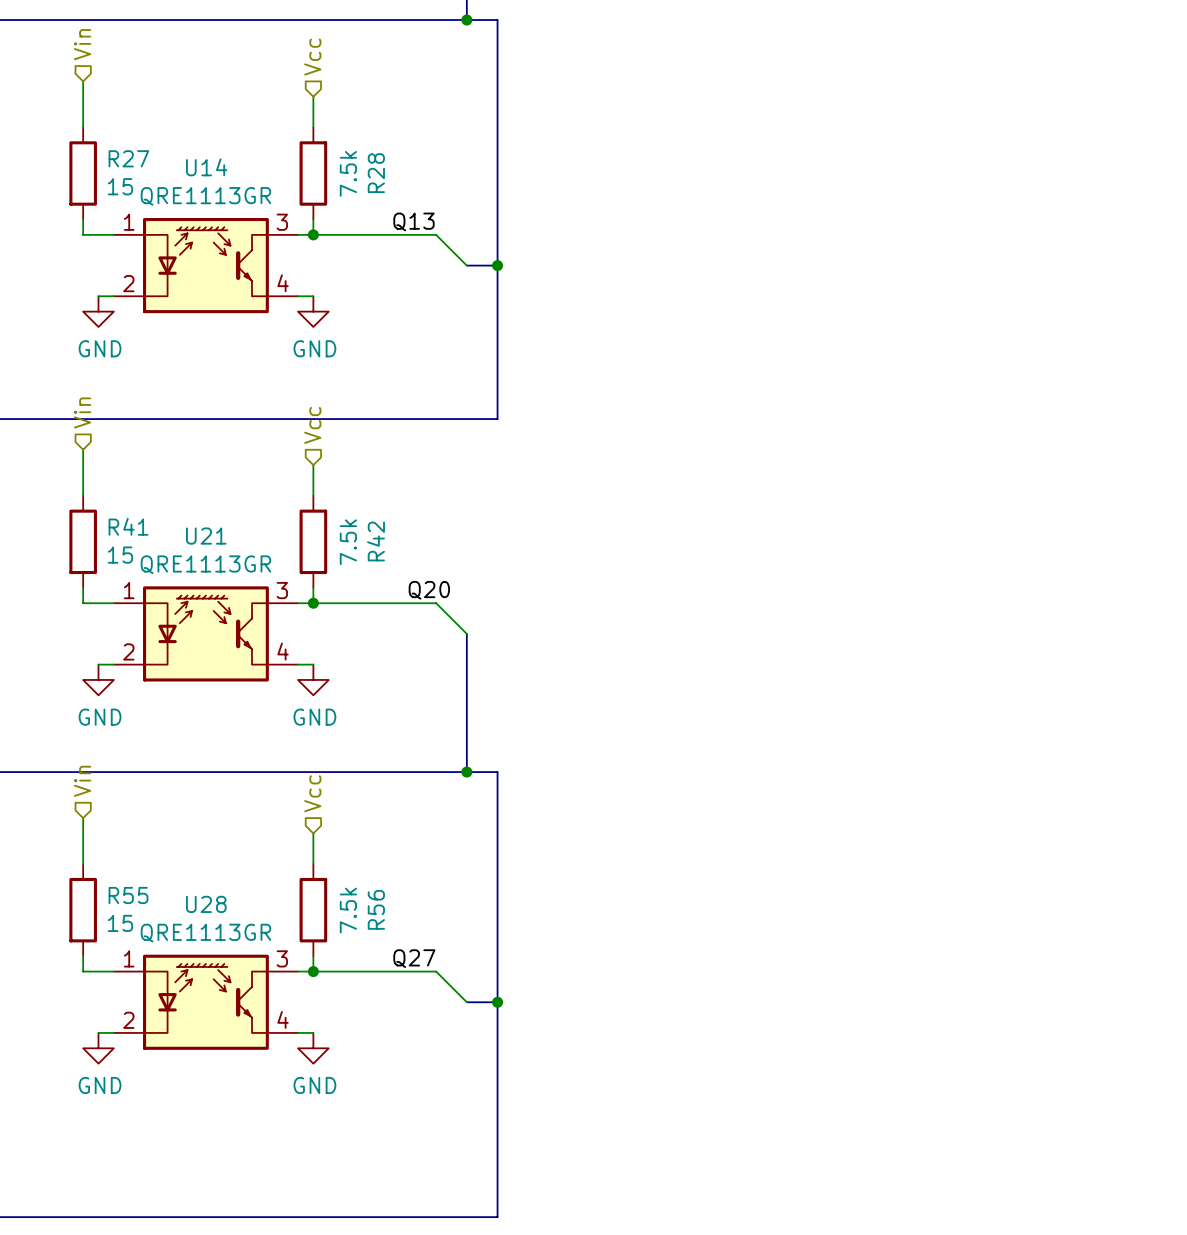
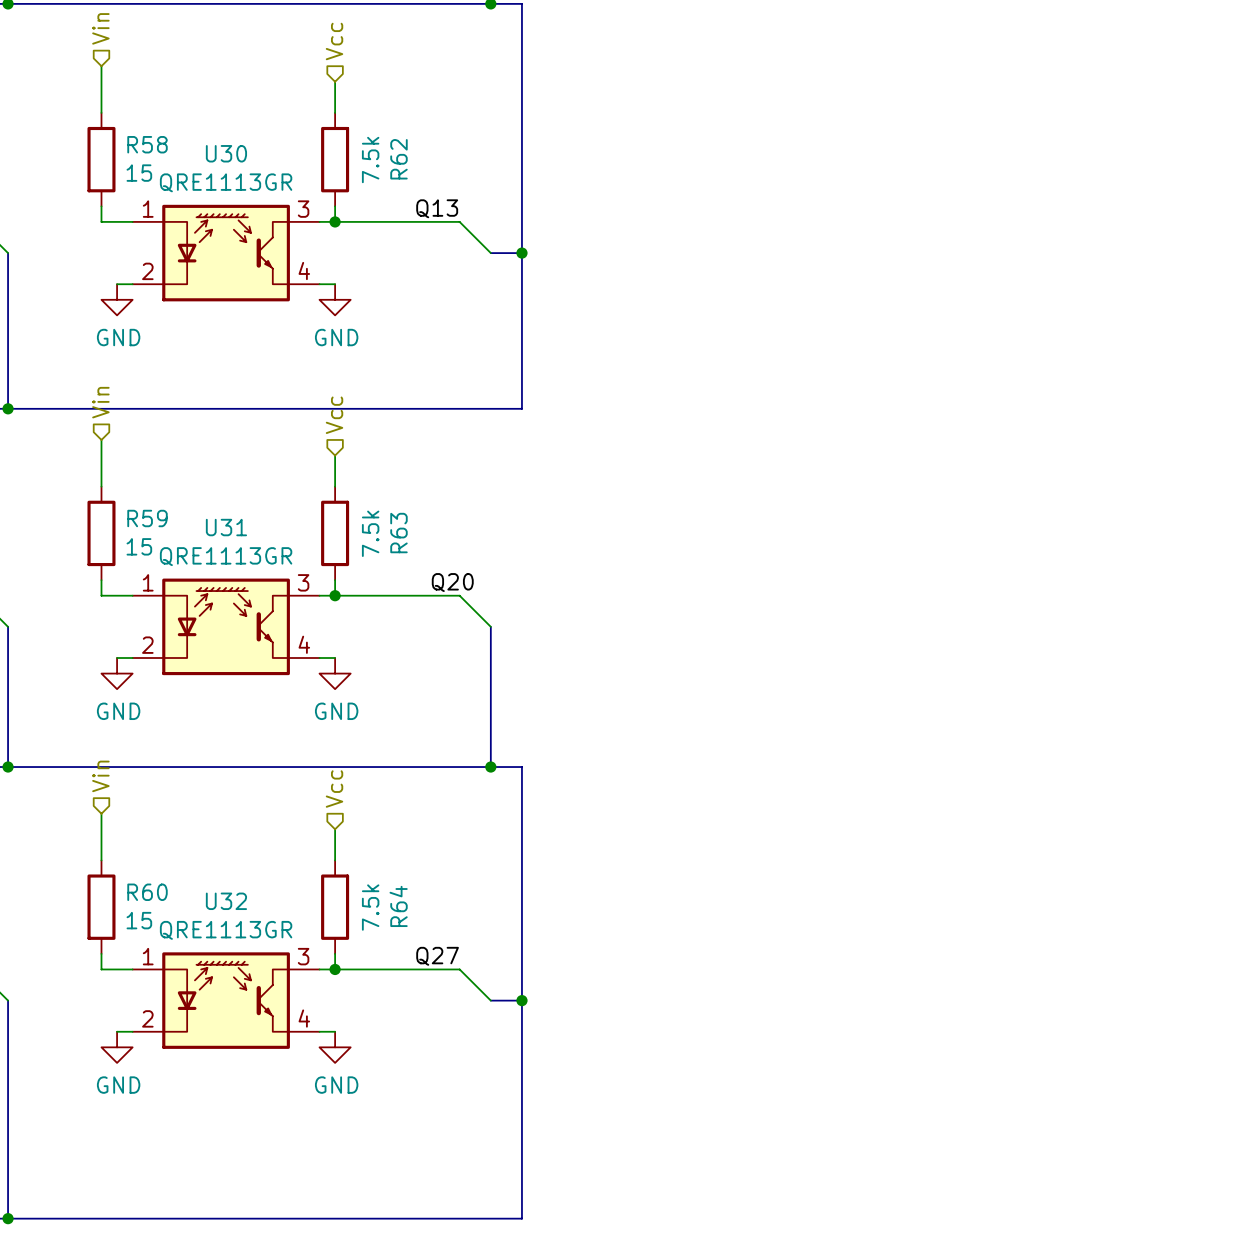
R27 name: R27 (128, 158) -> R58 (147, 144)
U14 name: U14 (206, 167) -> U30 (226, 153)
R28 name: R28 (376, 173) -> R62 (398, 159)
R41 name: R41 (128, 526) -> R59 (147, 518)
U21 name: U21 (206, 536) -> U31 (226, 527)
R42 name: R42 (375, 541) -> R63 (398, 533)
R55 name: R55 (128, 895) -> R60 (147, 892)
U28 name: U28 (206, 904) -> U32 (226, 901)
R56 name: R56 (376, 909) -> R64 (398, 906)

